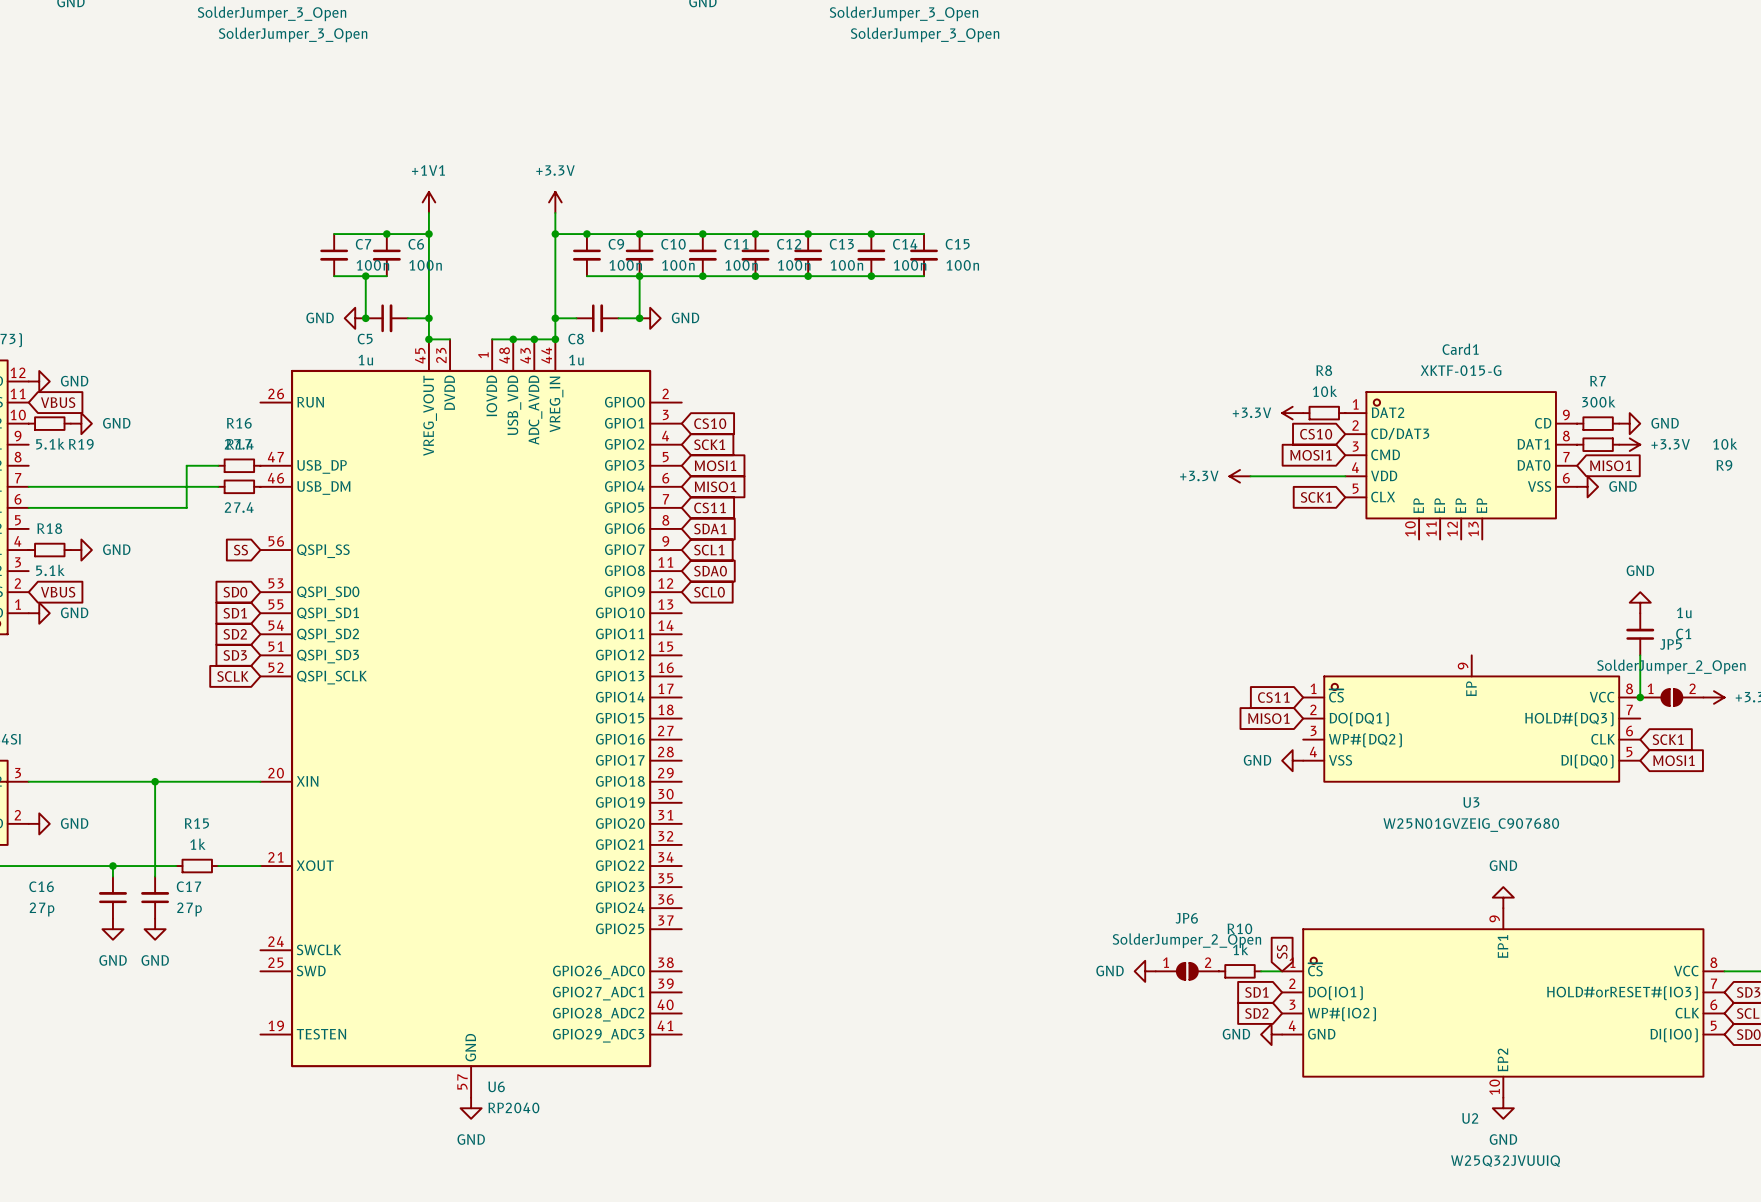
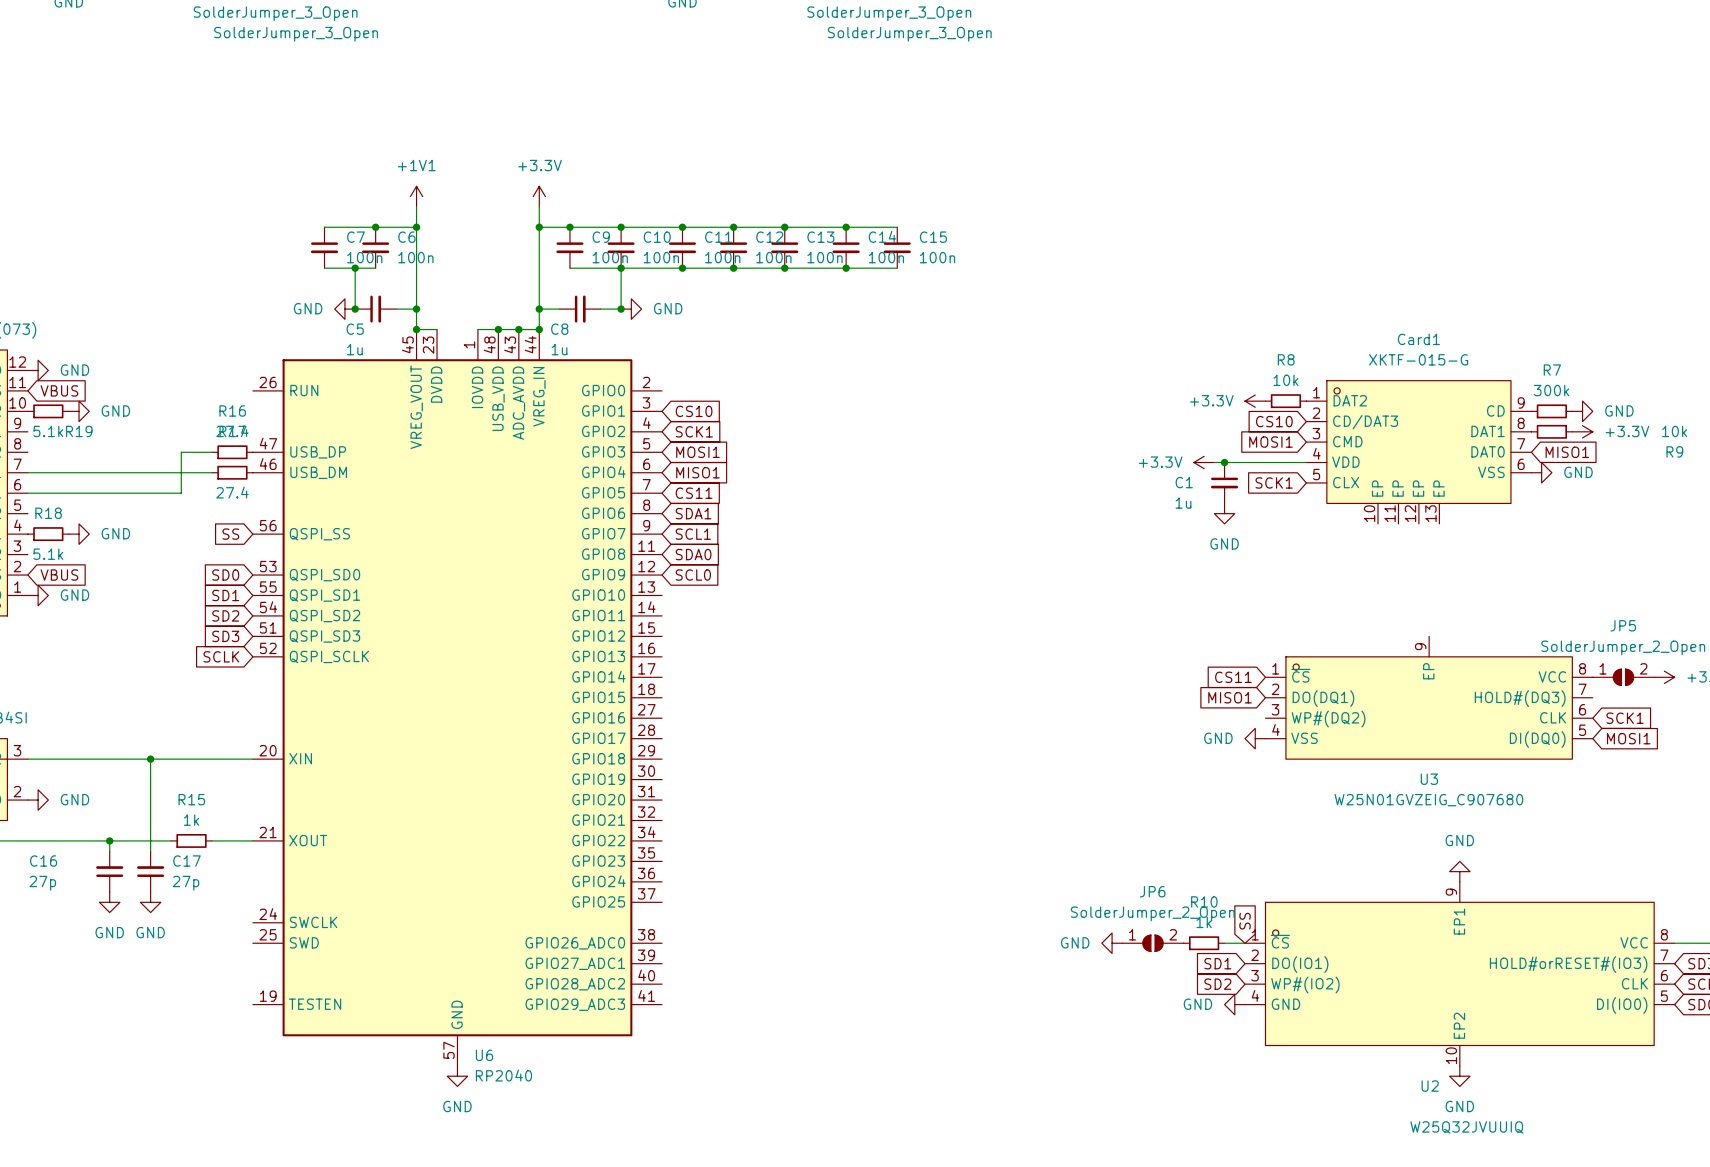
junction: none -> (1224, 462)
power symbol: none -> GND (1224, 513)
power symbol: GND (1640, 602) -> none
C1 rotation: 0° (1640, 634) -> 180° (1224, 483)
C1 position: (1640, 634) -> (1224, 482)
wire: (1640, 655) (1640, 697) -> none
junction: (1640, 697) -> none

